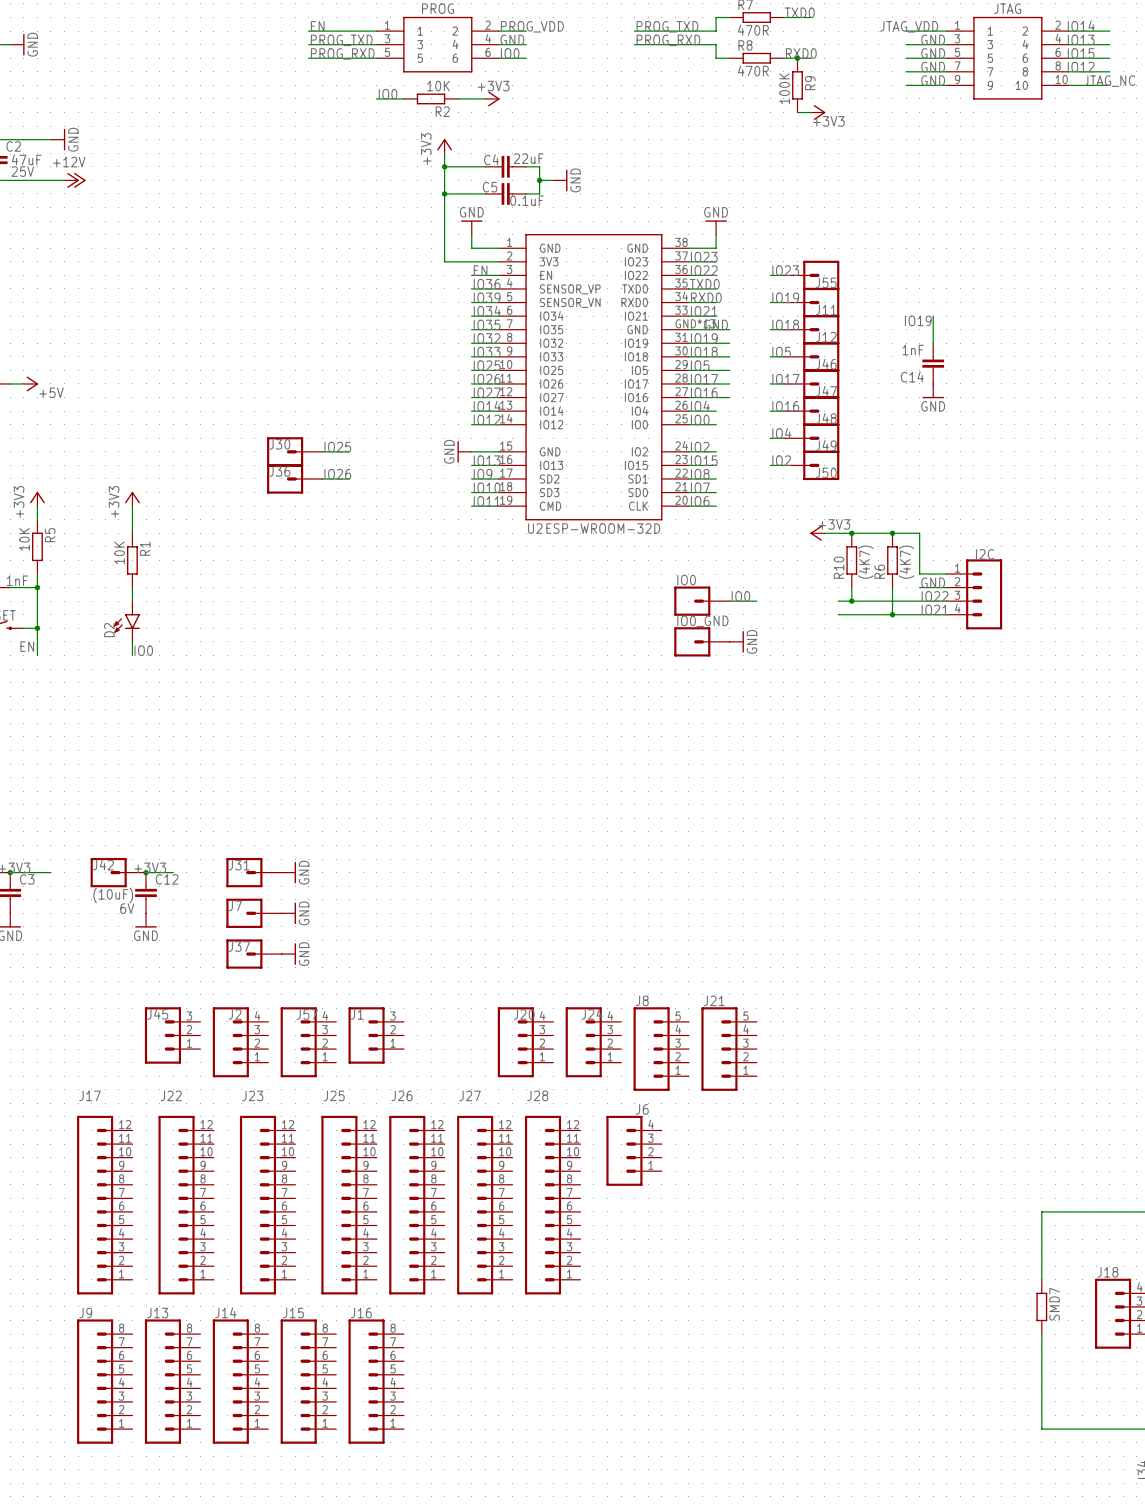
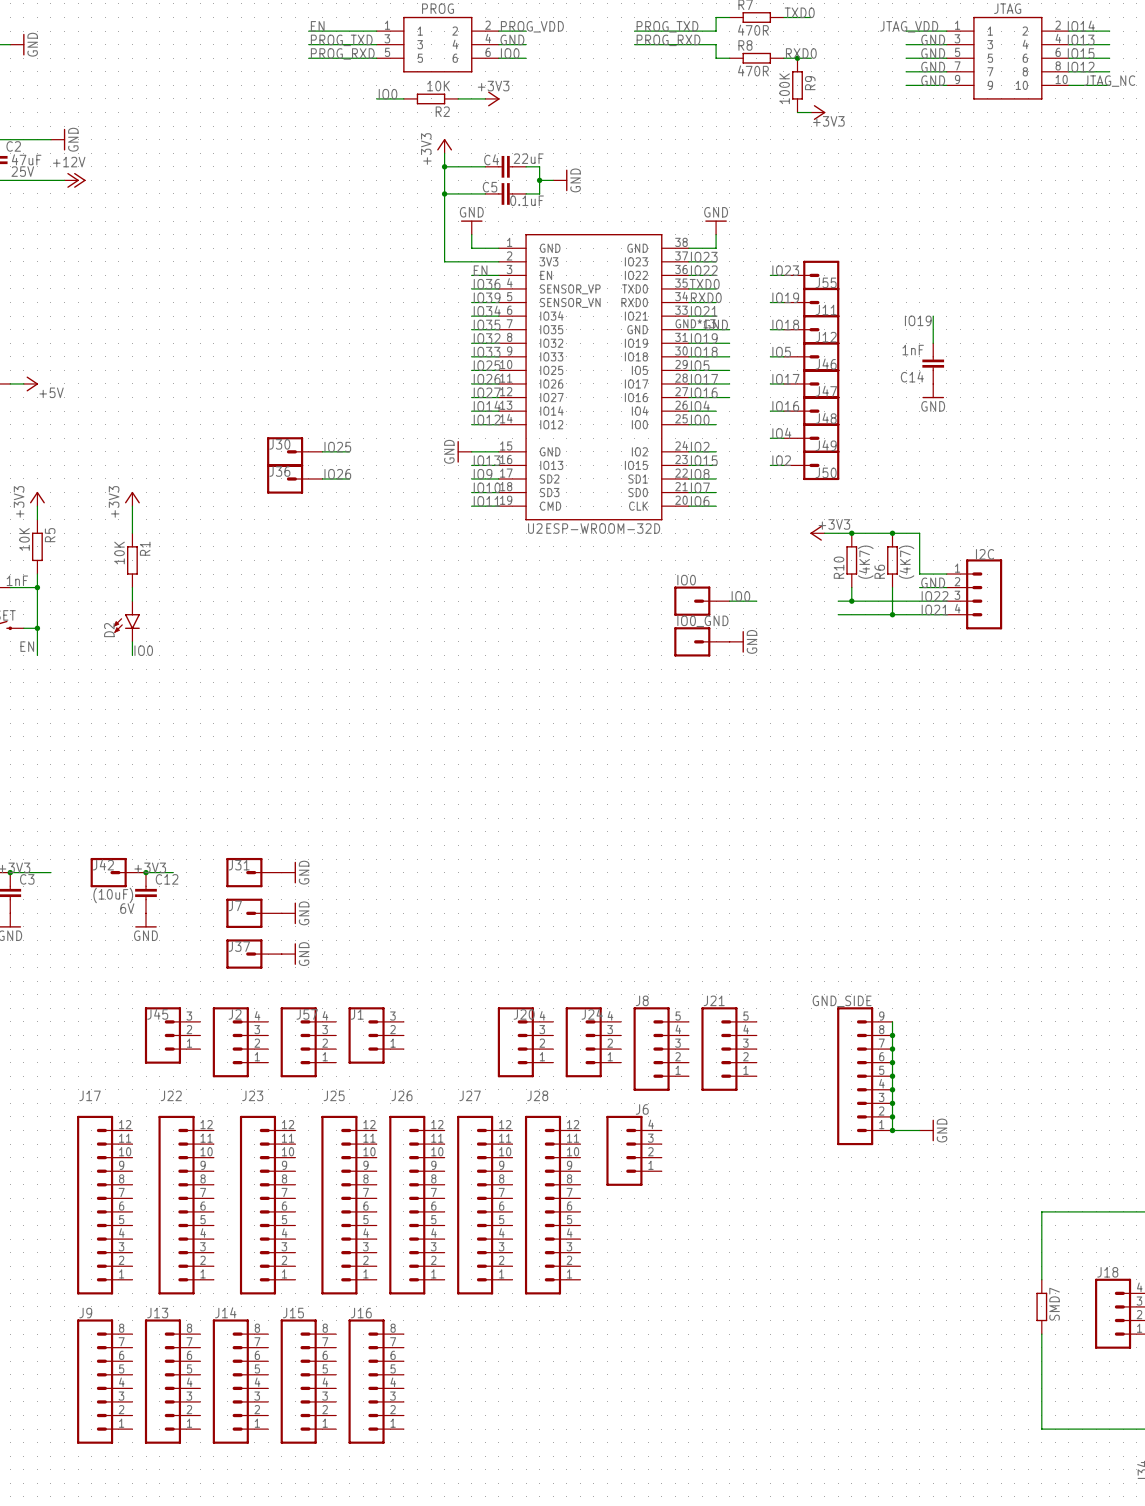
wire: none -> (892, 1021) (892, 1130) (919, 1130)
junction: none -> (892, 1035)
junction: none -> (892, 1049)
junction: none -> (892, 1062)
GND_SIDE: none -> (864, 1076)
junction: none -> (892, 1076)
junction: none -> (892, 1089)
junction: none -> (892, 1103)
junction: none -> (892, 1116)
junction: none -> (892, 1130)
power symbol: none -> GND (926, 1130)

